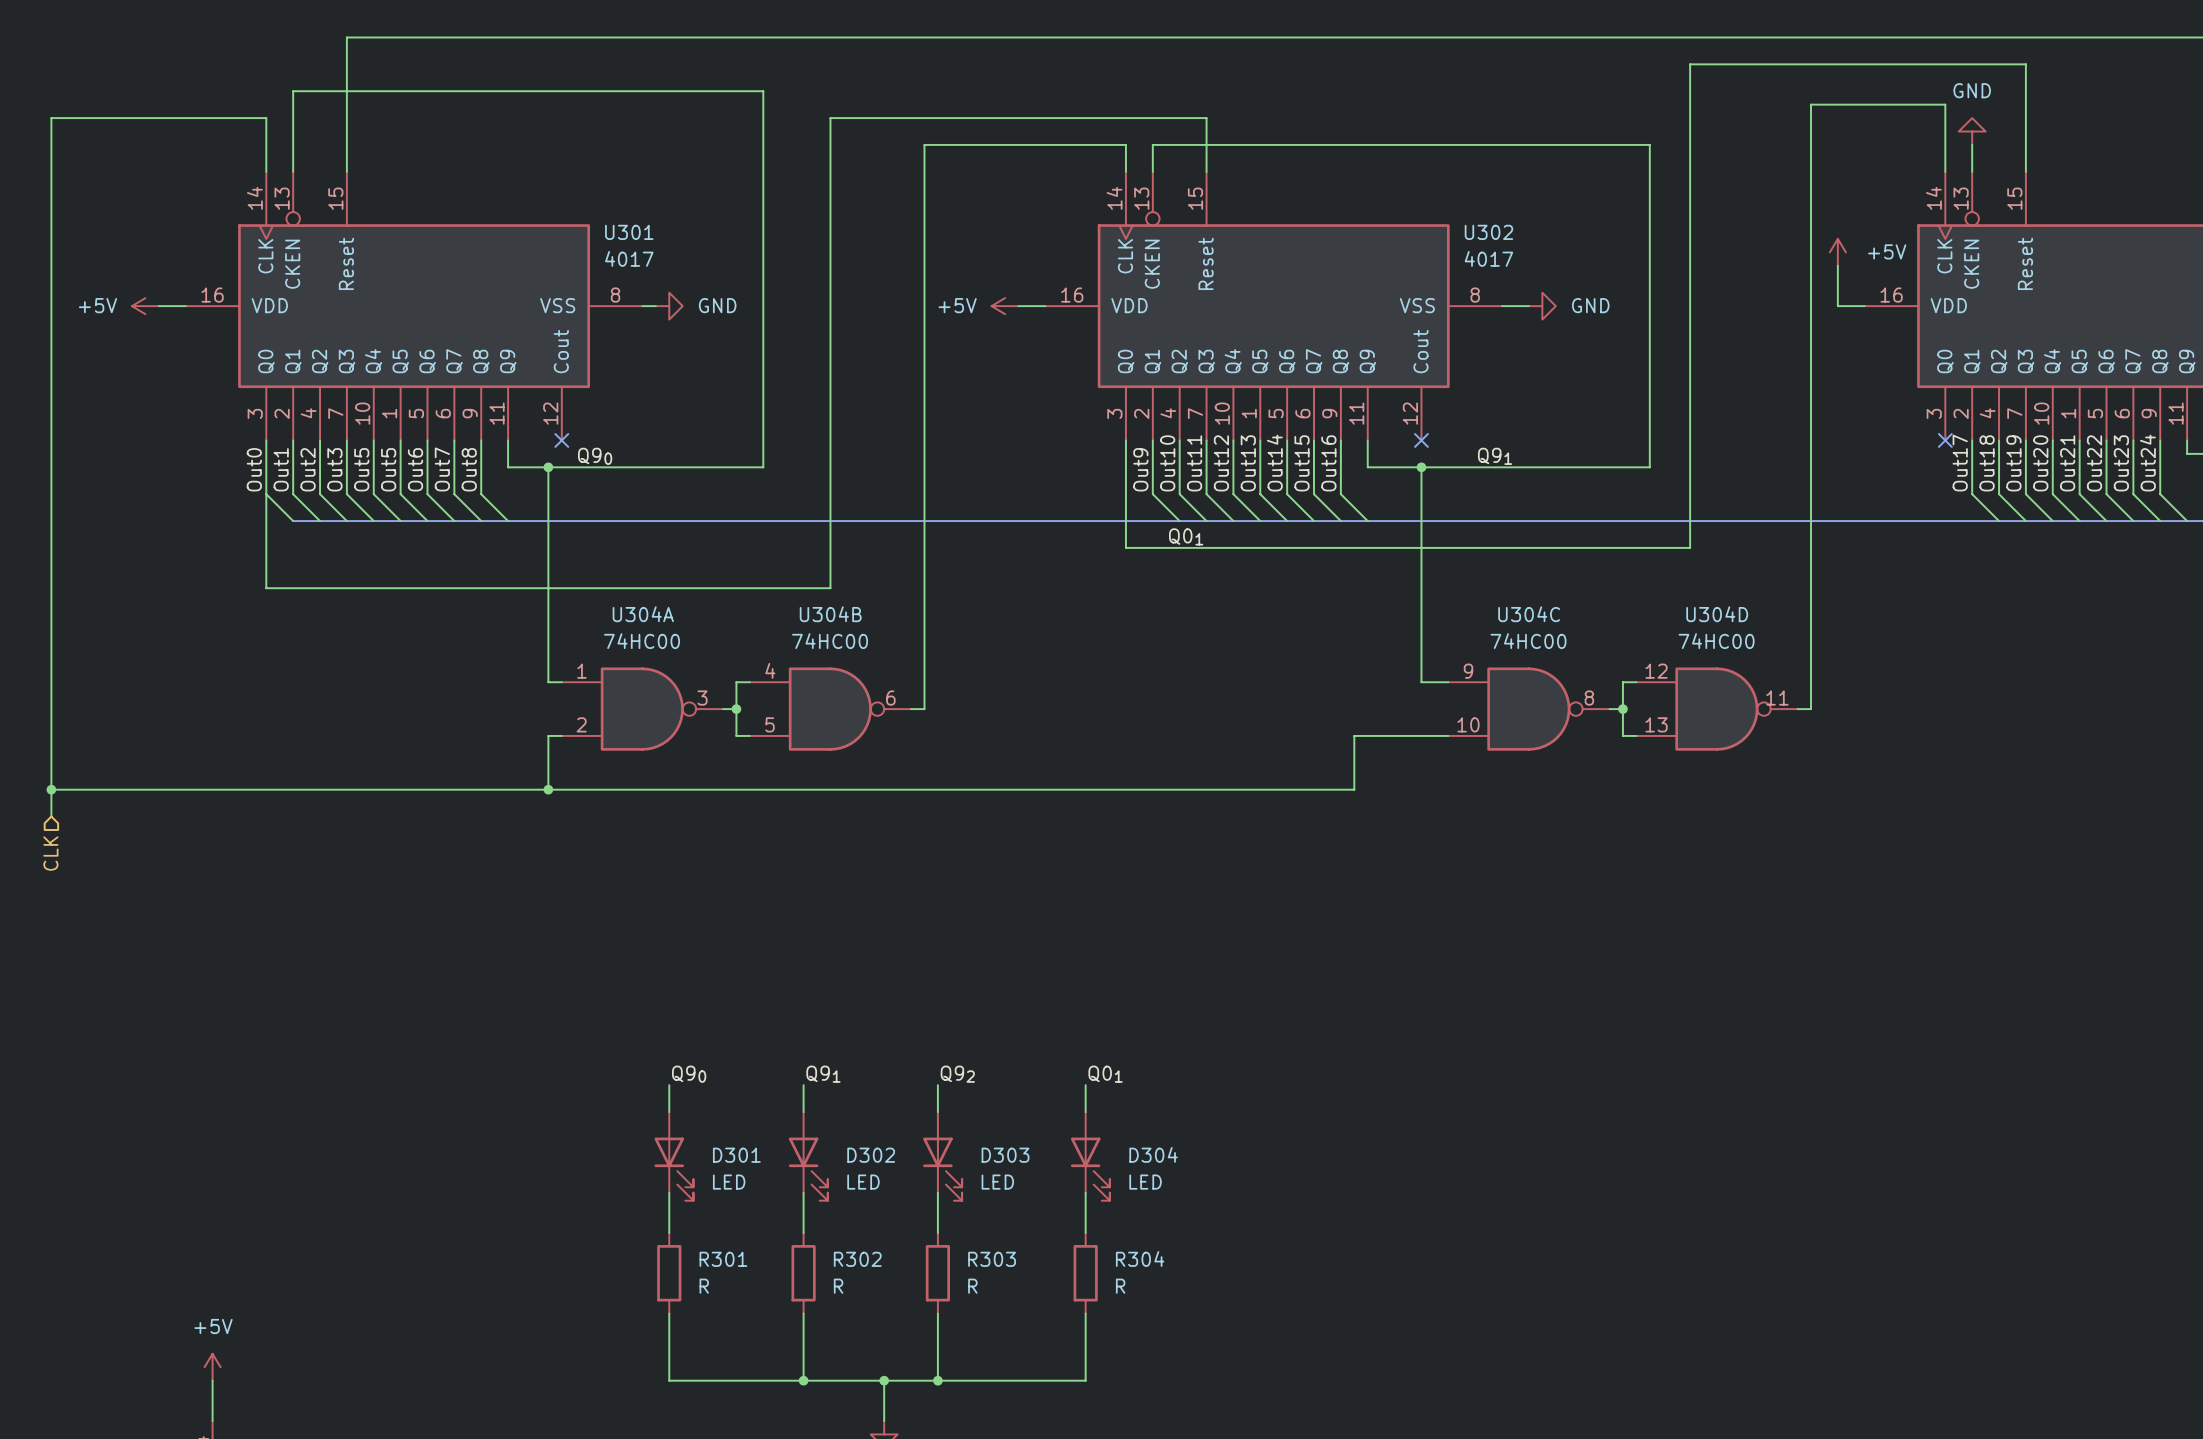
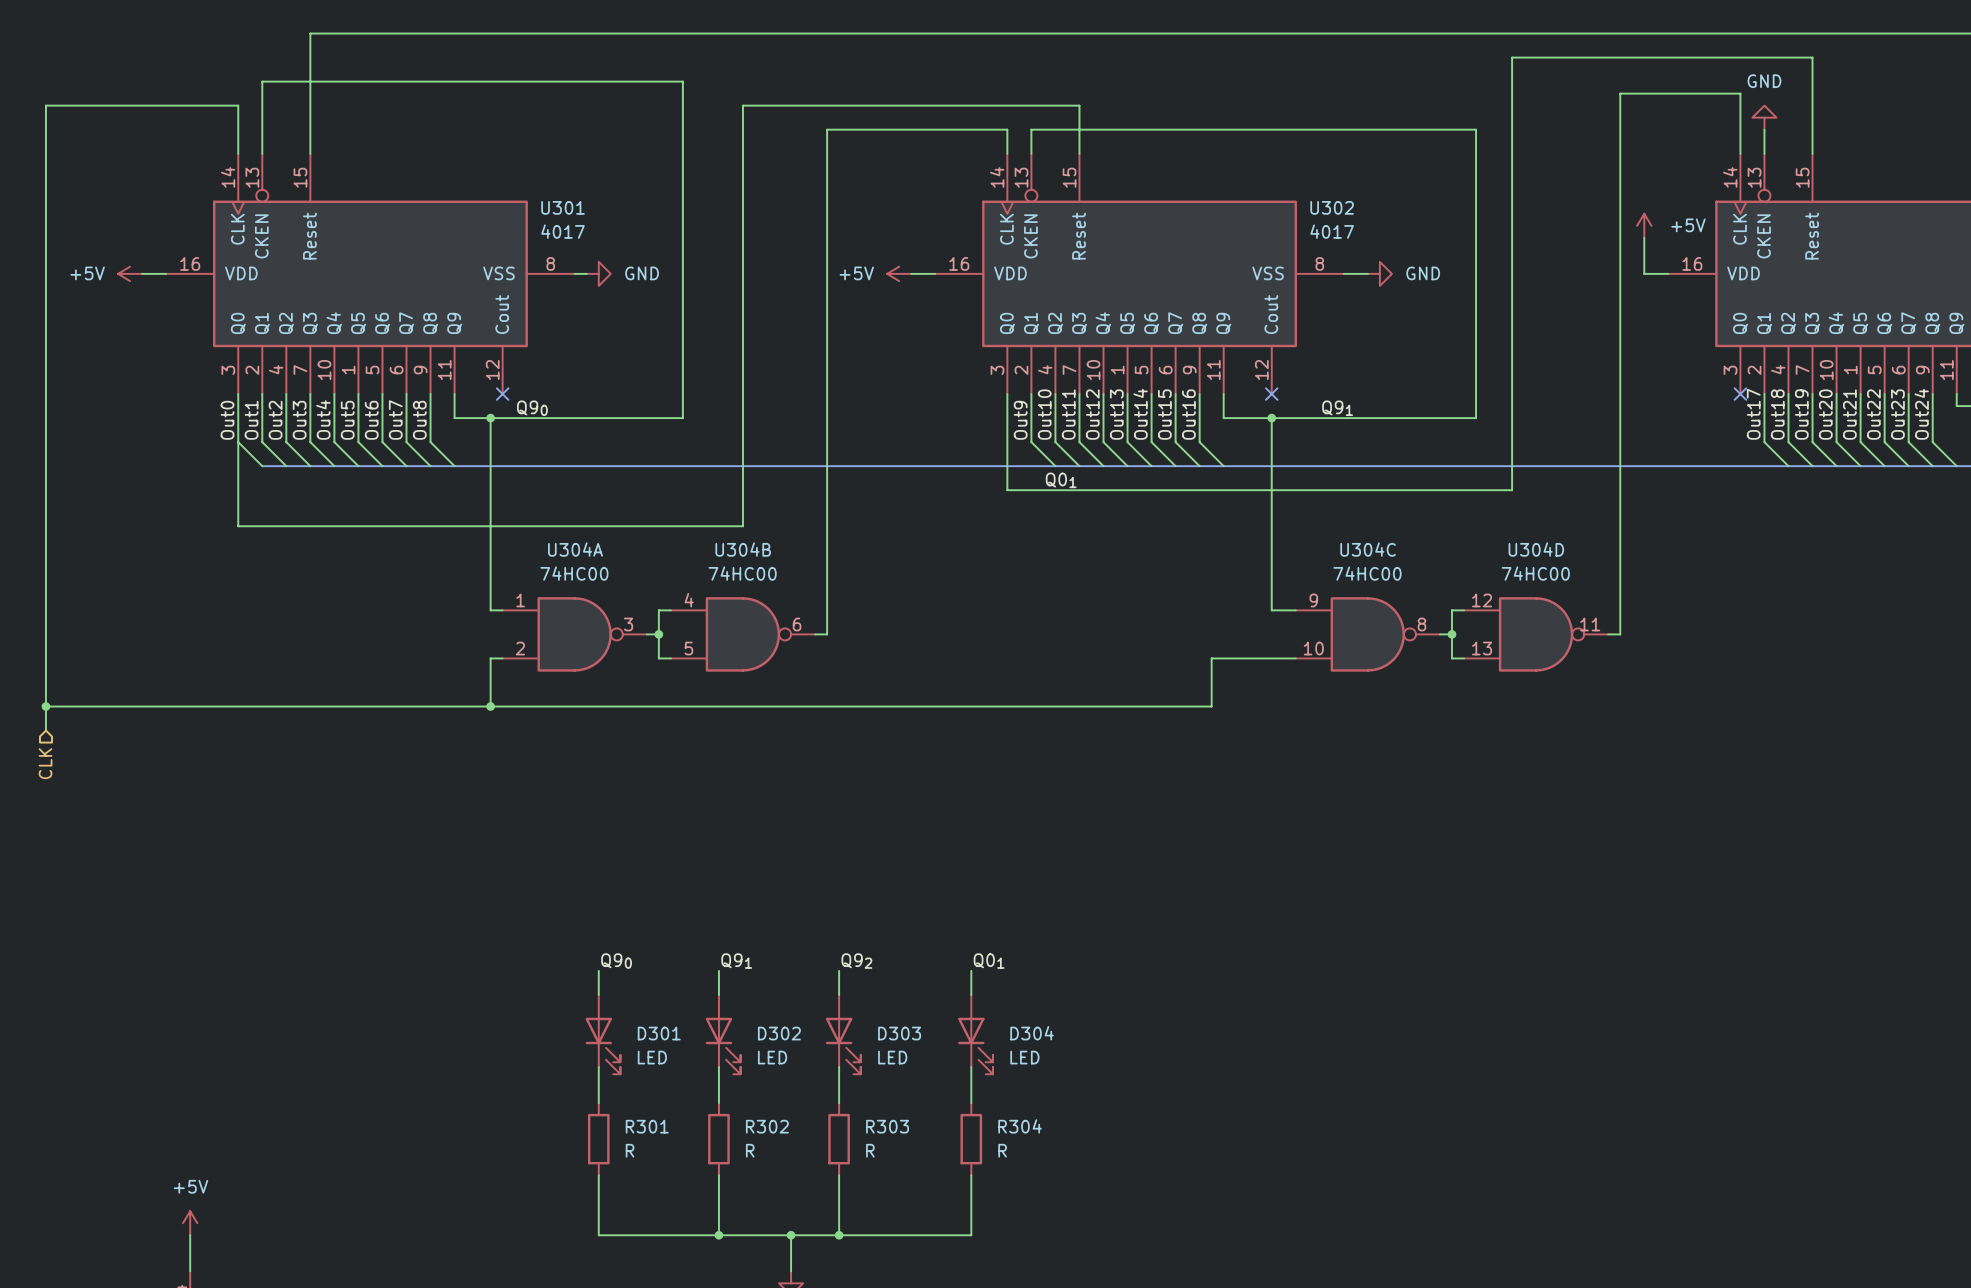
label: Out5 (361, 469) -> Out4 (323, 420)

